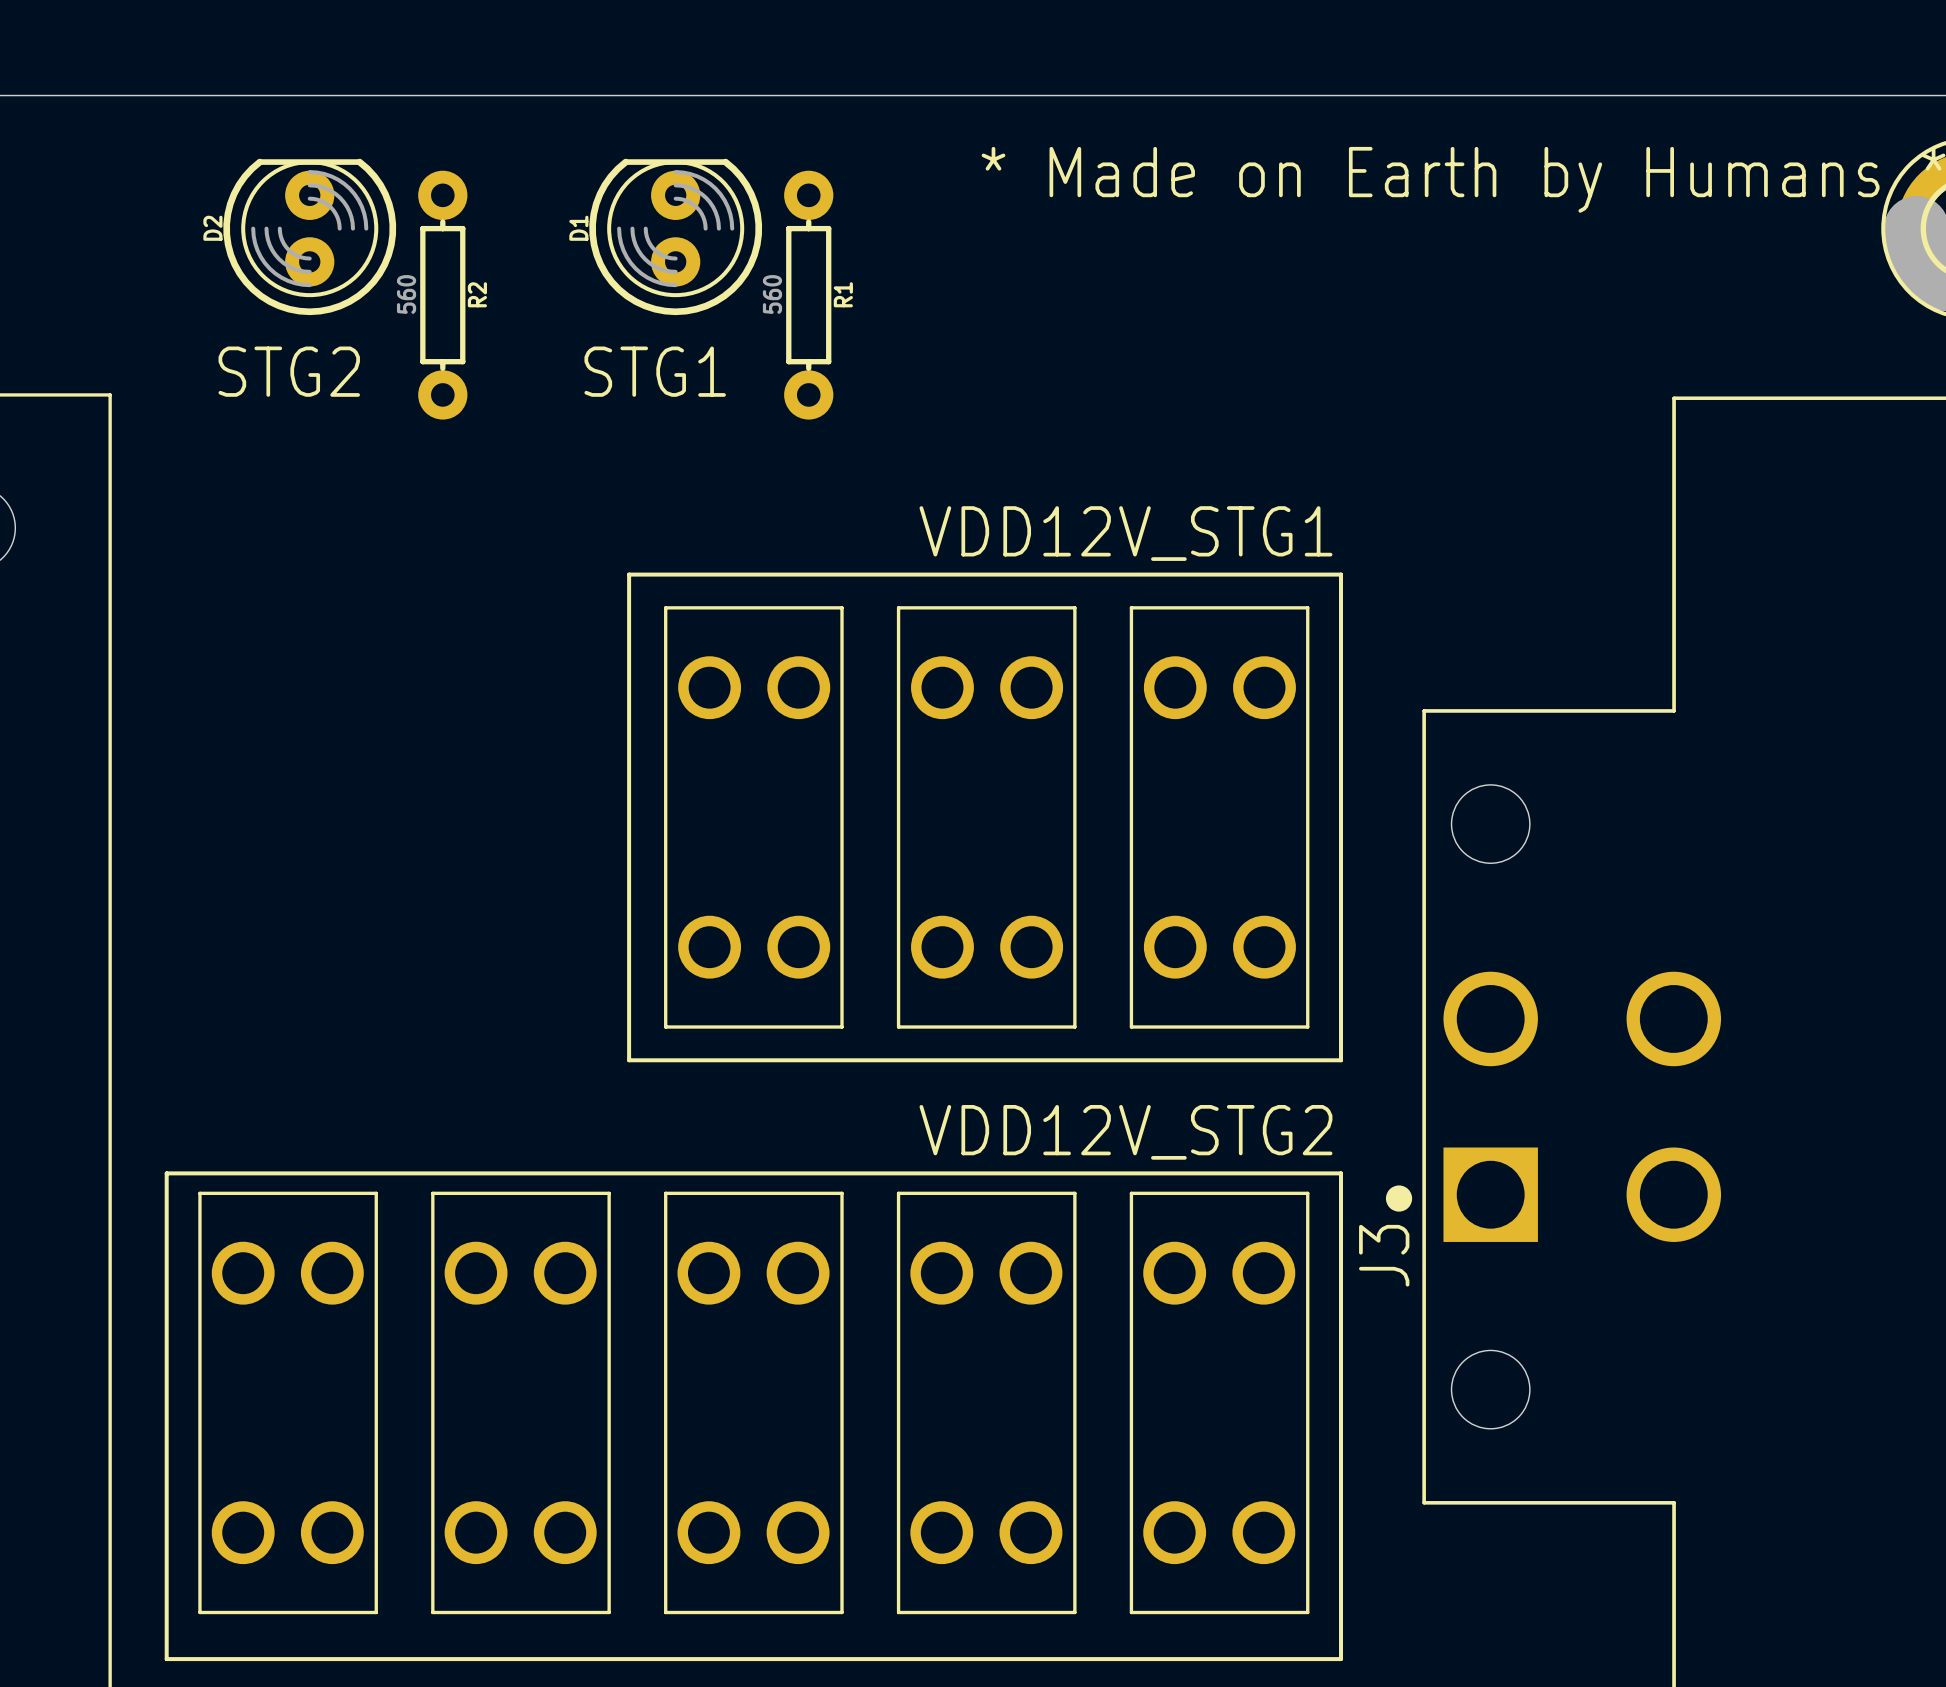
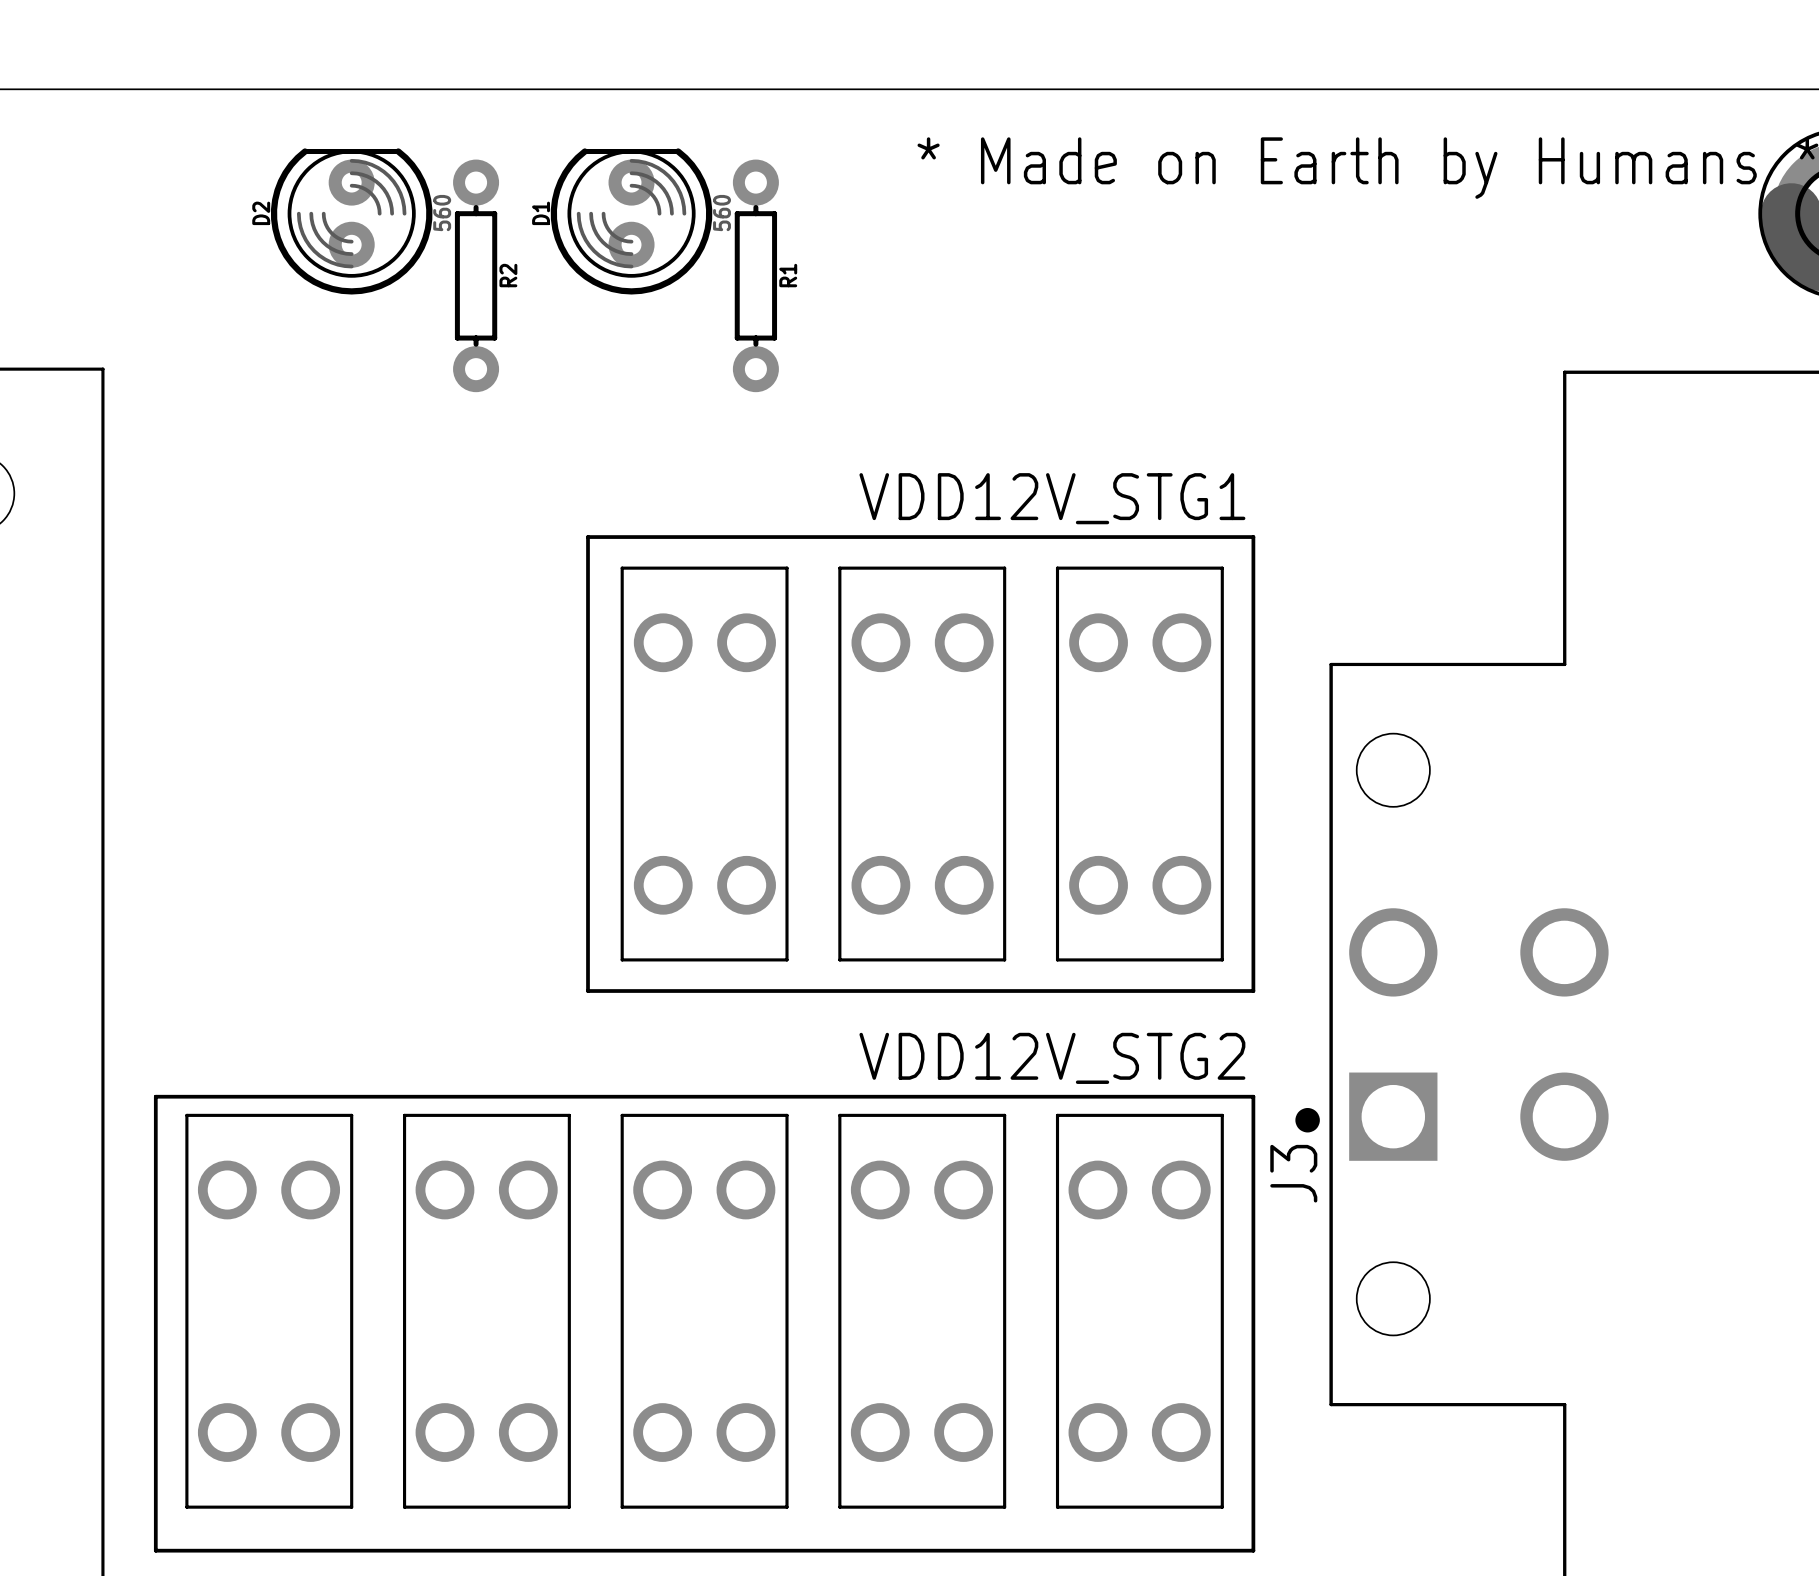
D2 position: (309, 236) -> (351, 221)
D2 value position: 560 (406, 294) -> 560 (442, 213)
D1 value position: 560 (772, 294) -> 560 (722, 213)
R2 position: (442, 295) -> (476, 275)
text: STG2 (289, 371) -> none
text: STG1 (655, 371) -> none

